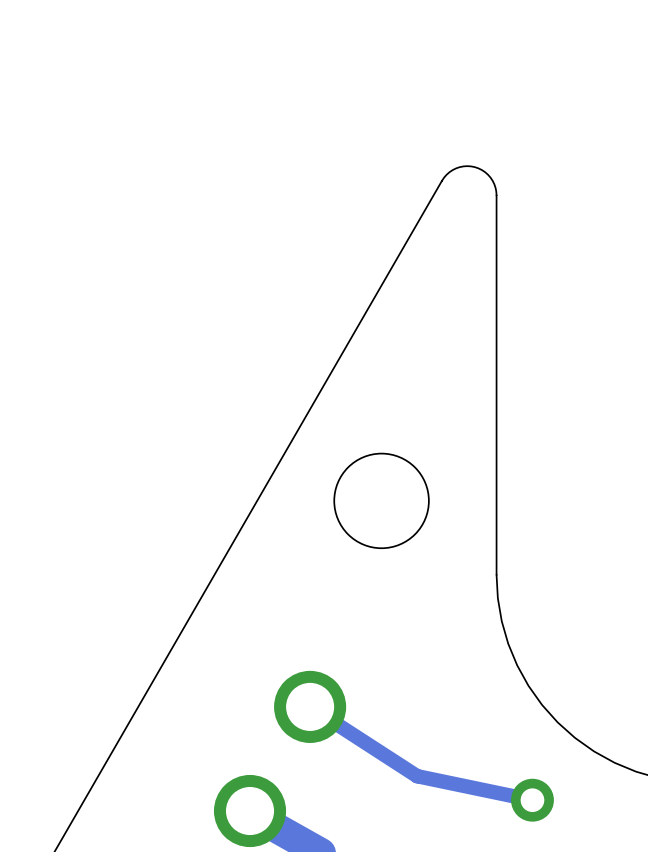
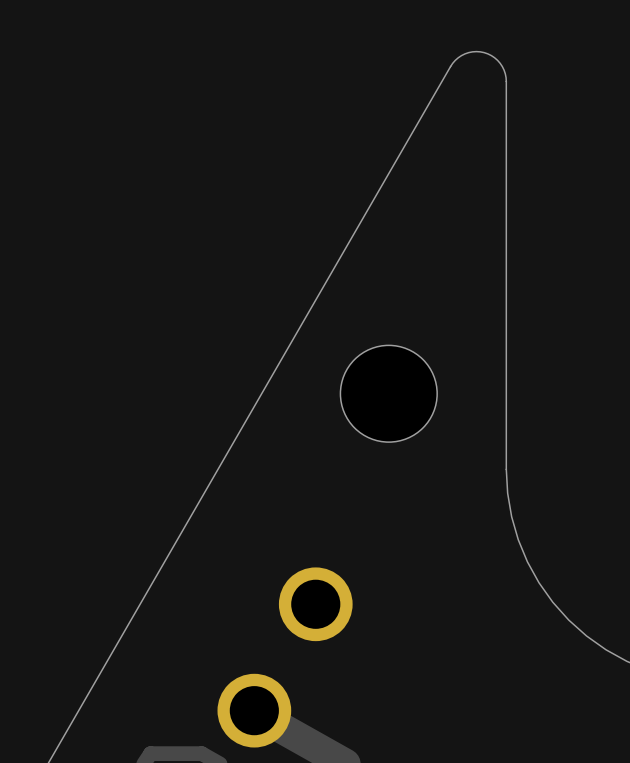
track: (310, 706) (417, 776) (532, 800) -> none
via: (532, 800) -> none

